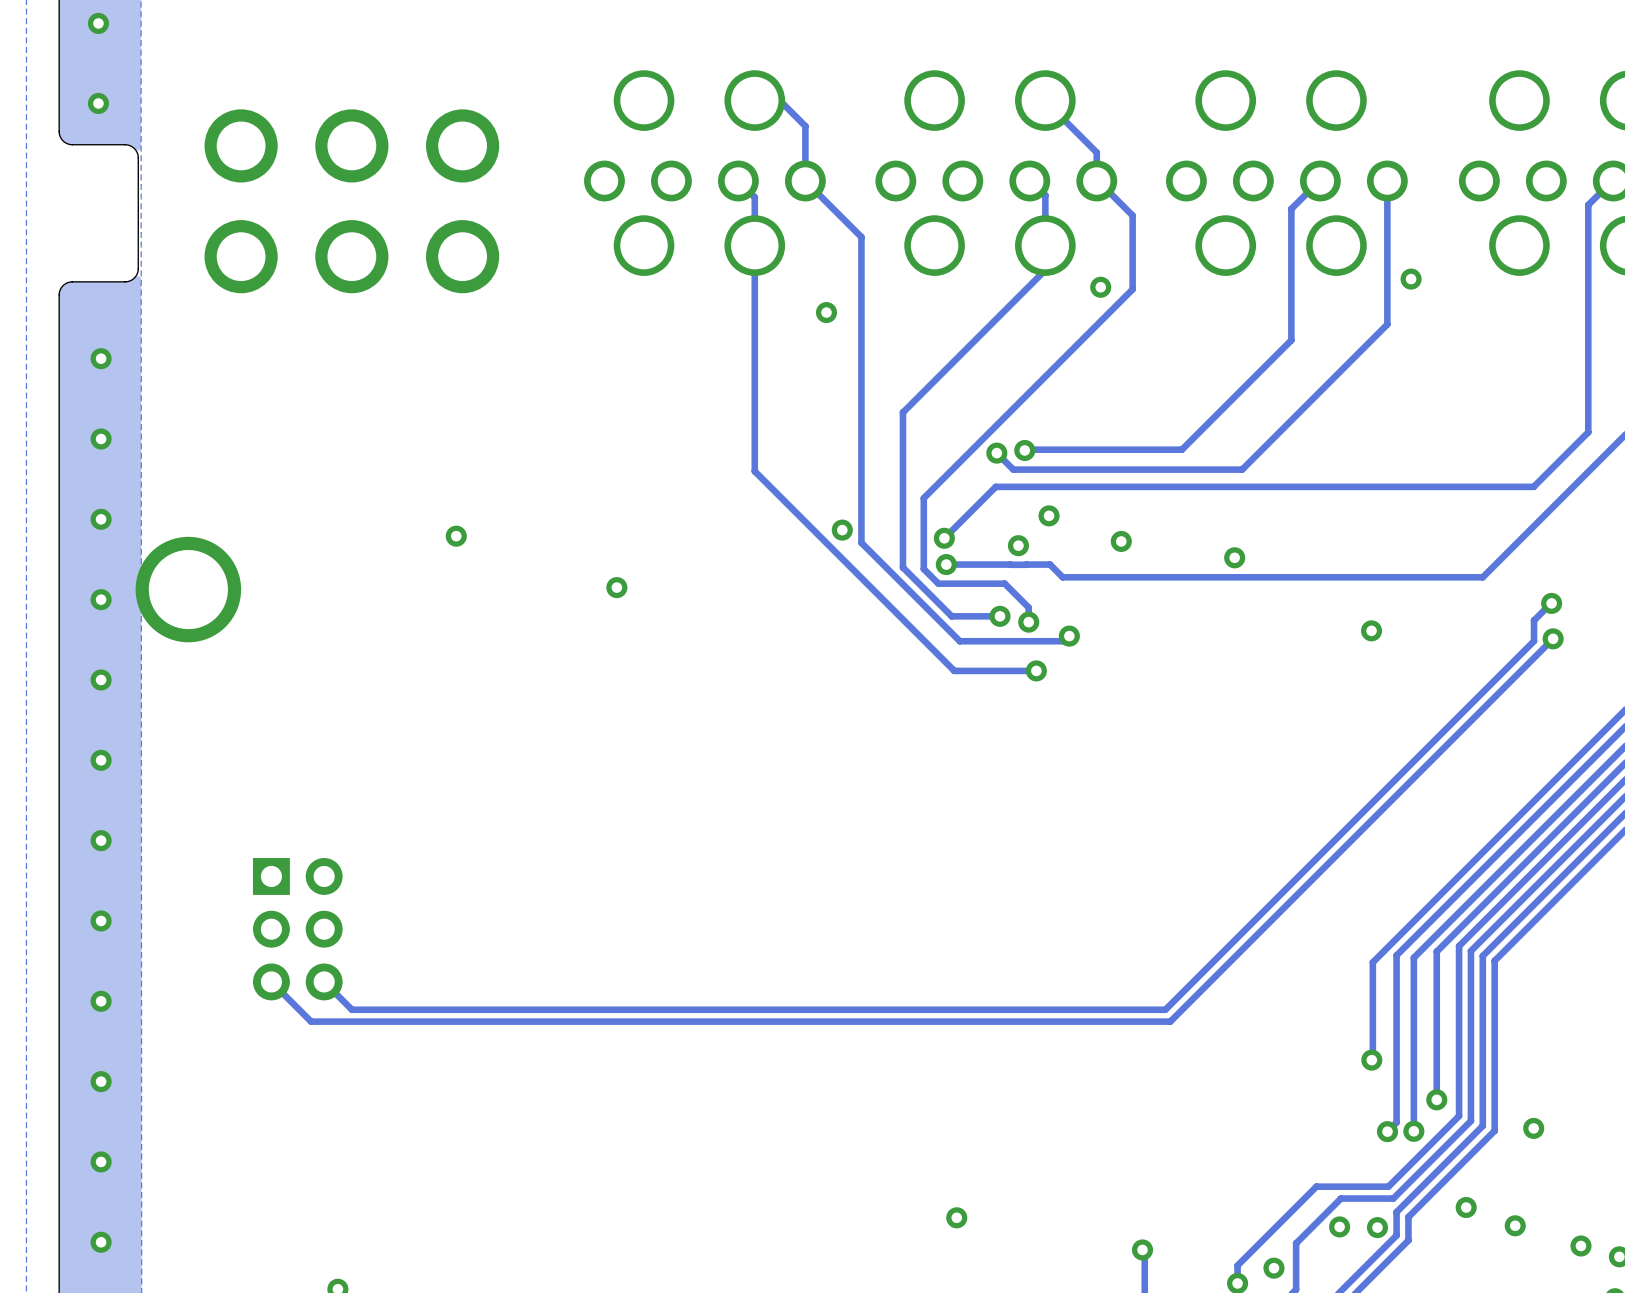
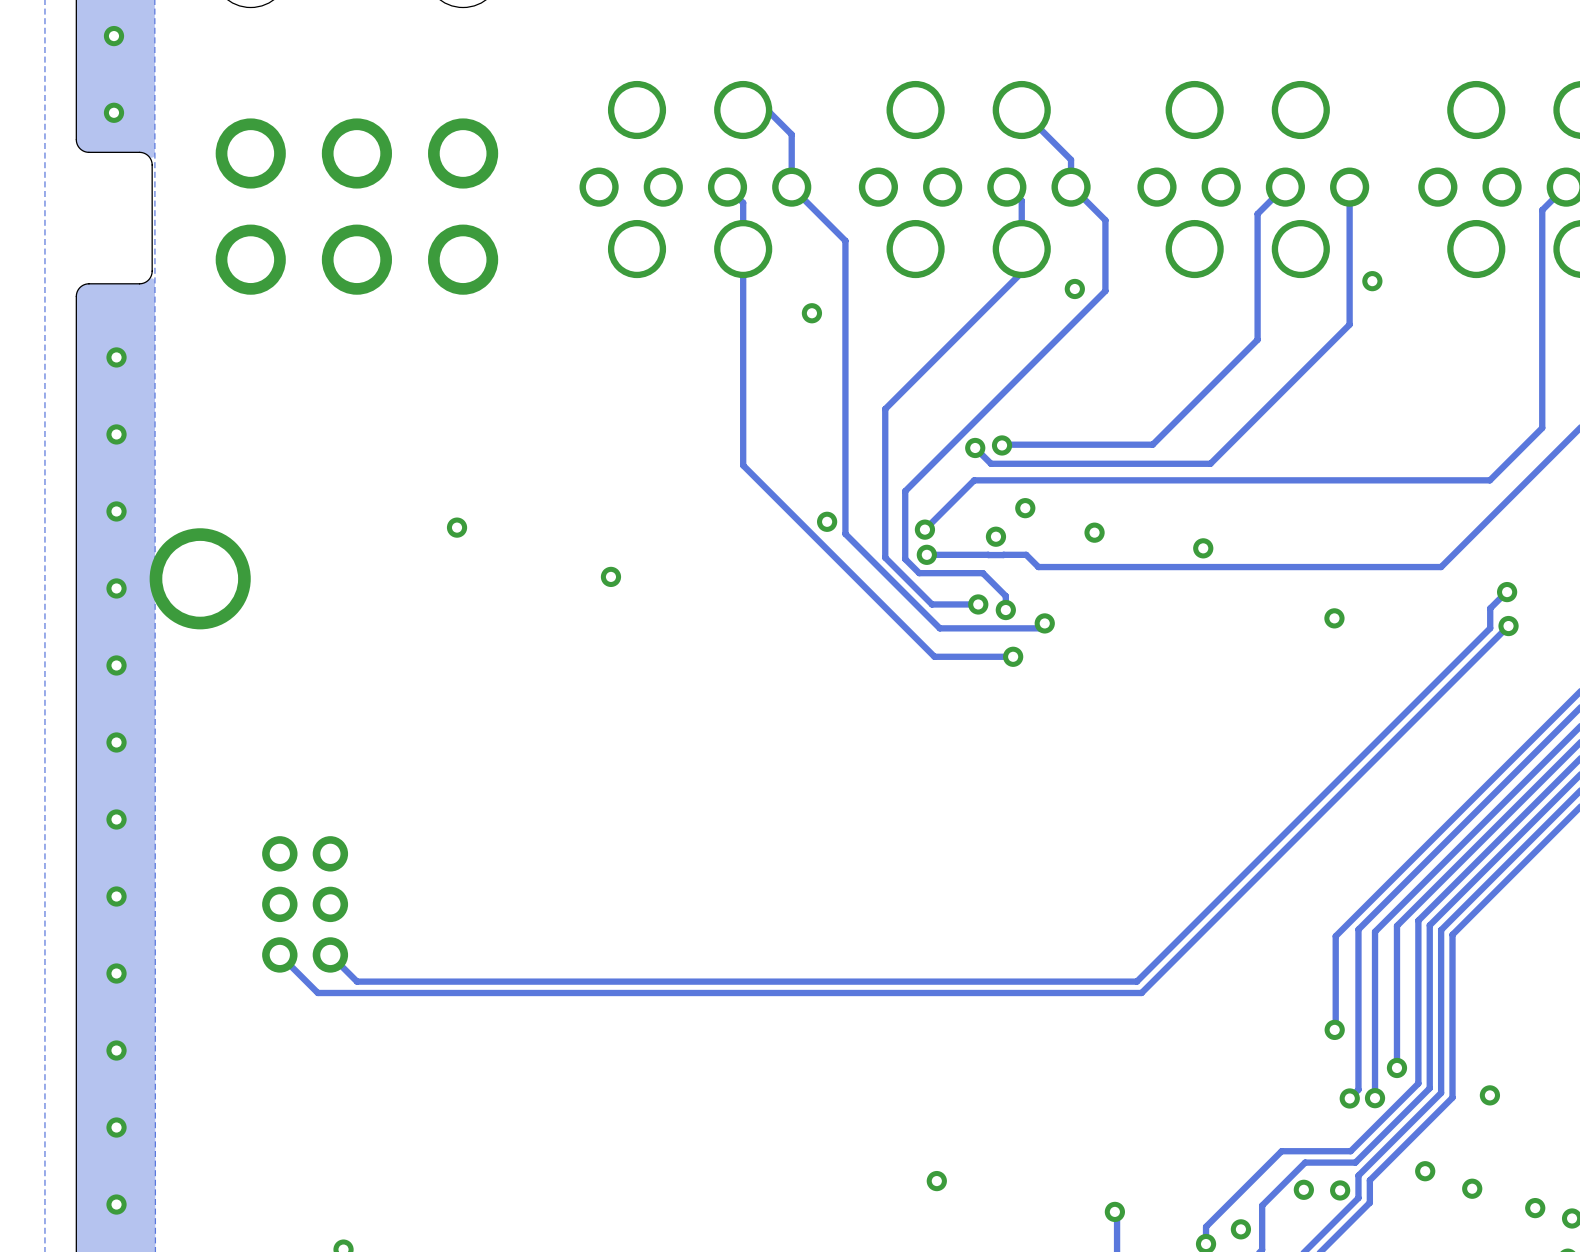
part footprint: [252, 858, 343, 1001] -> [262, 836, 349, 973]

